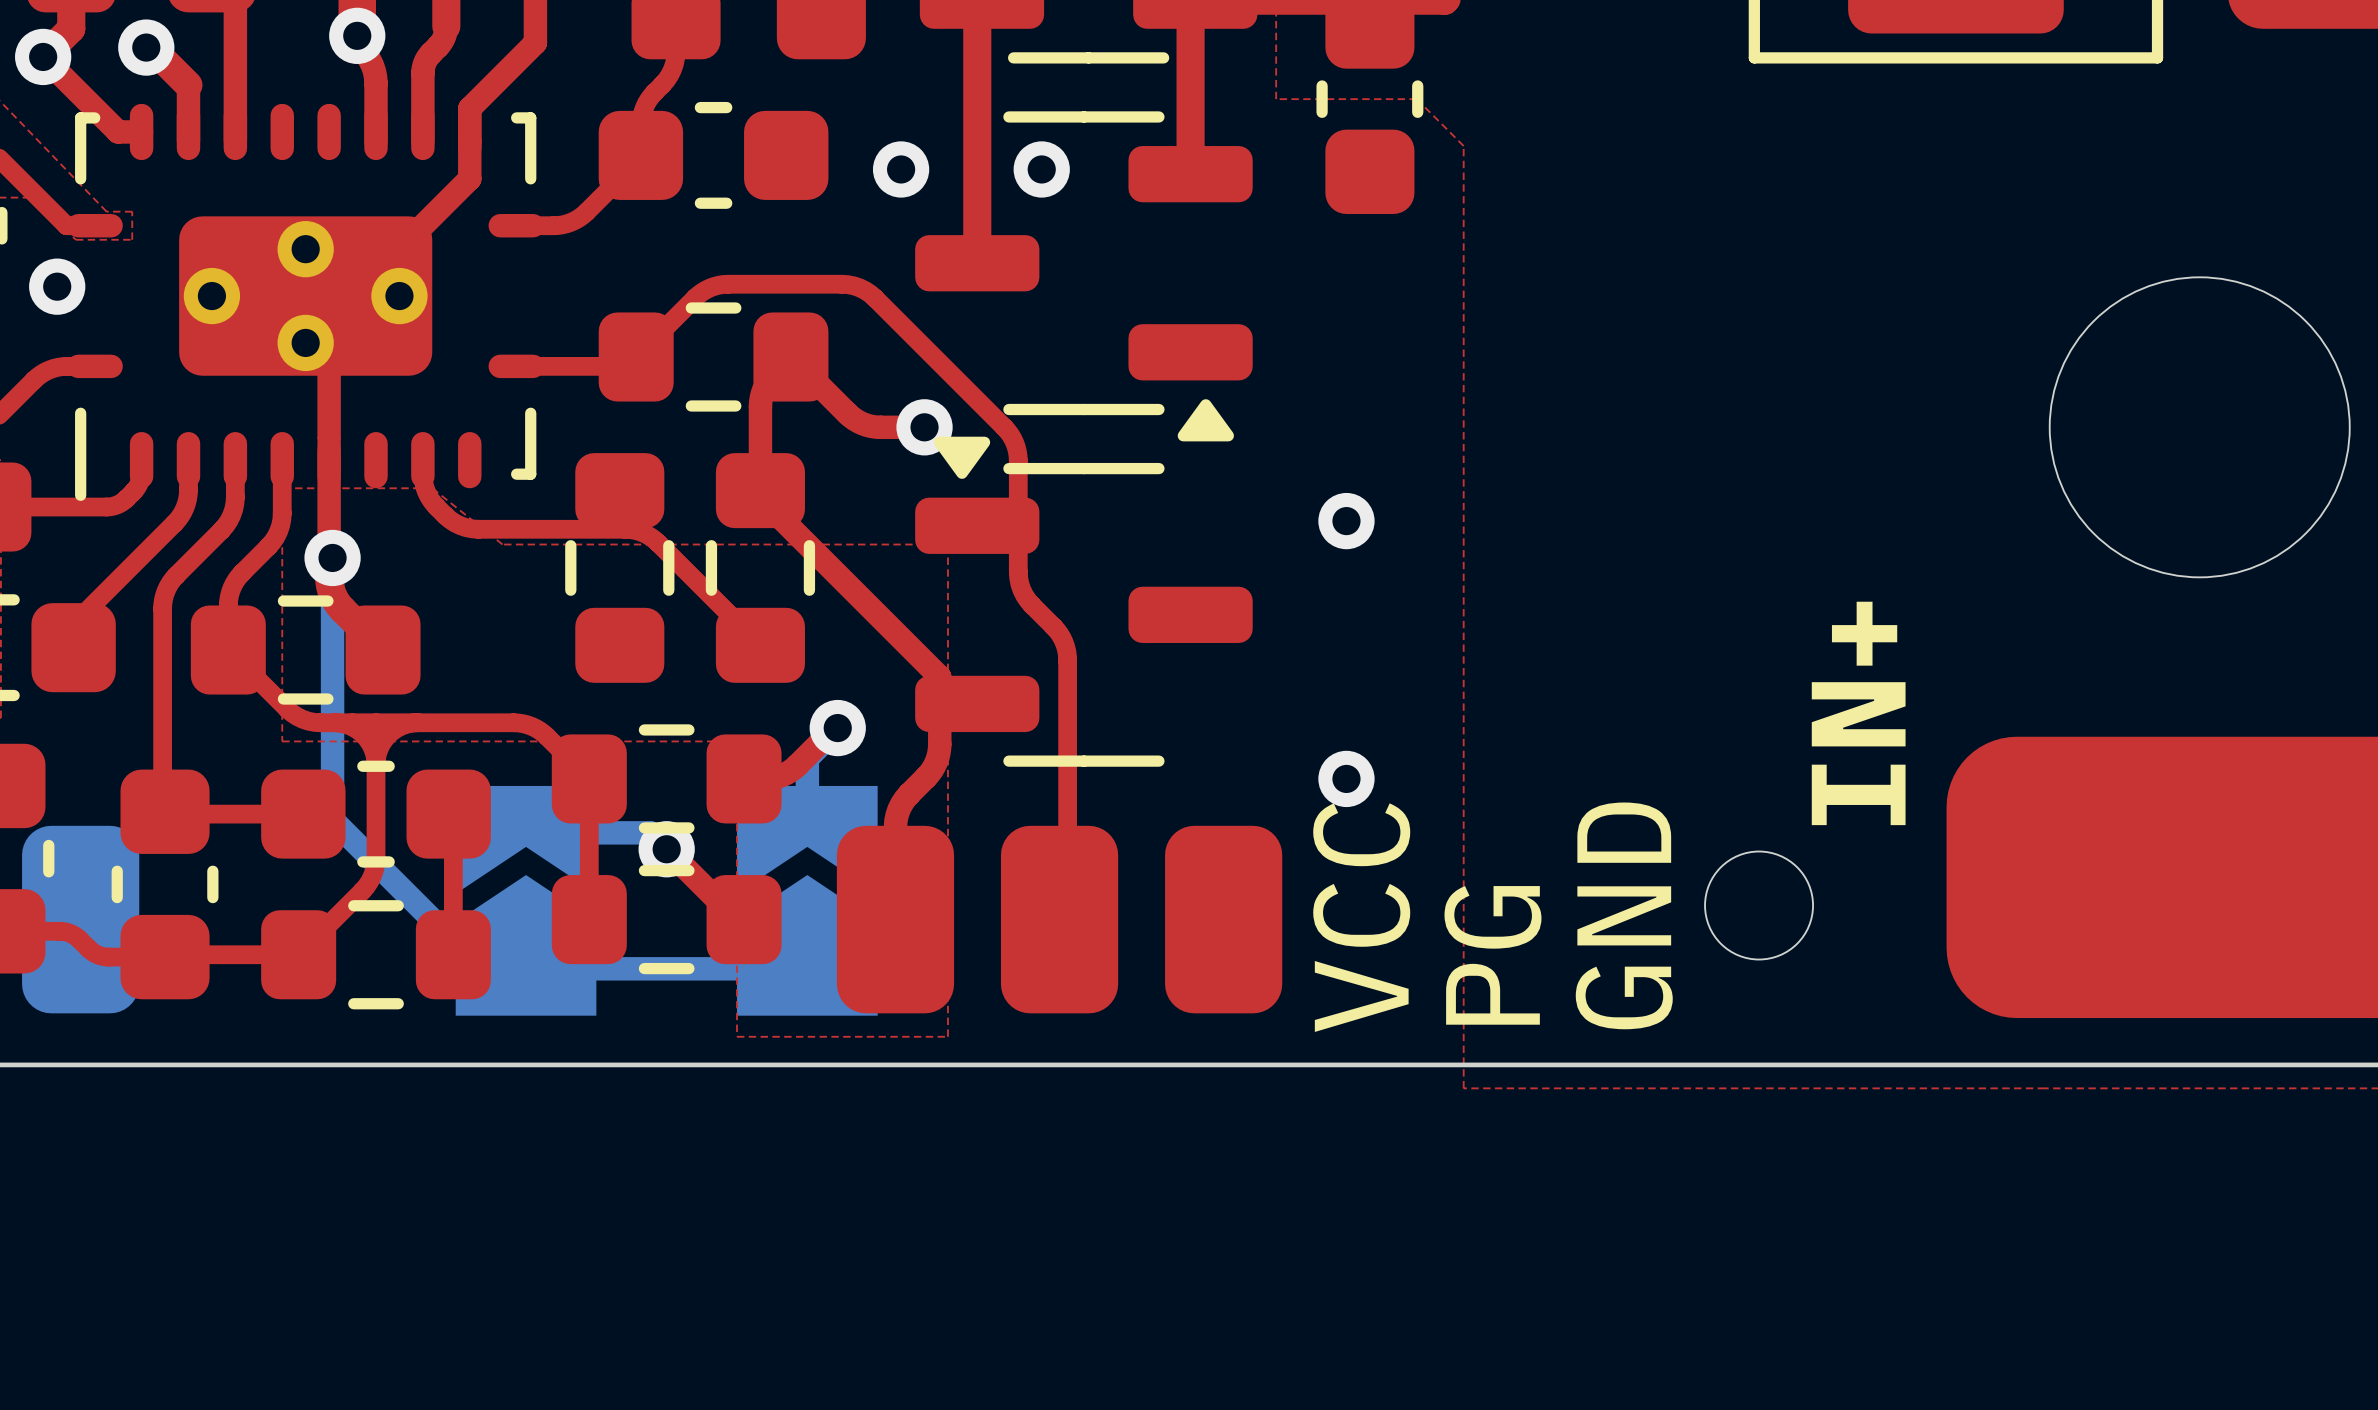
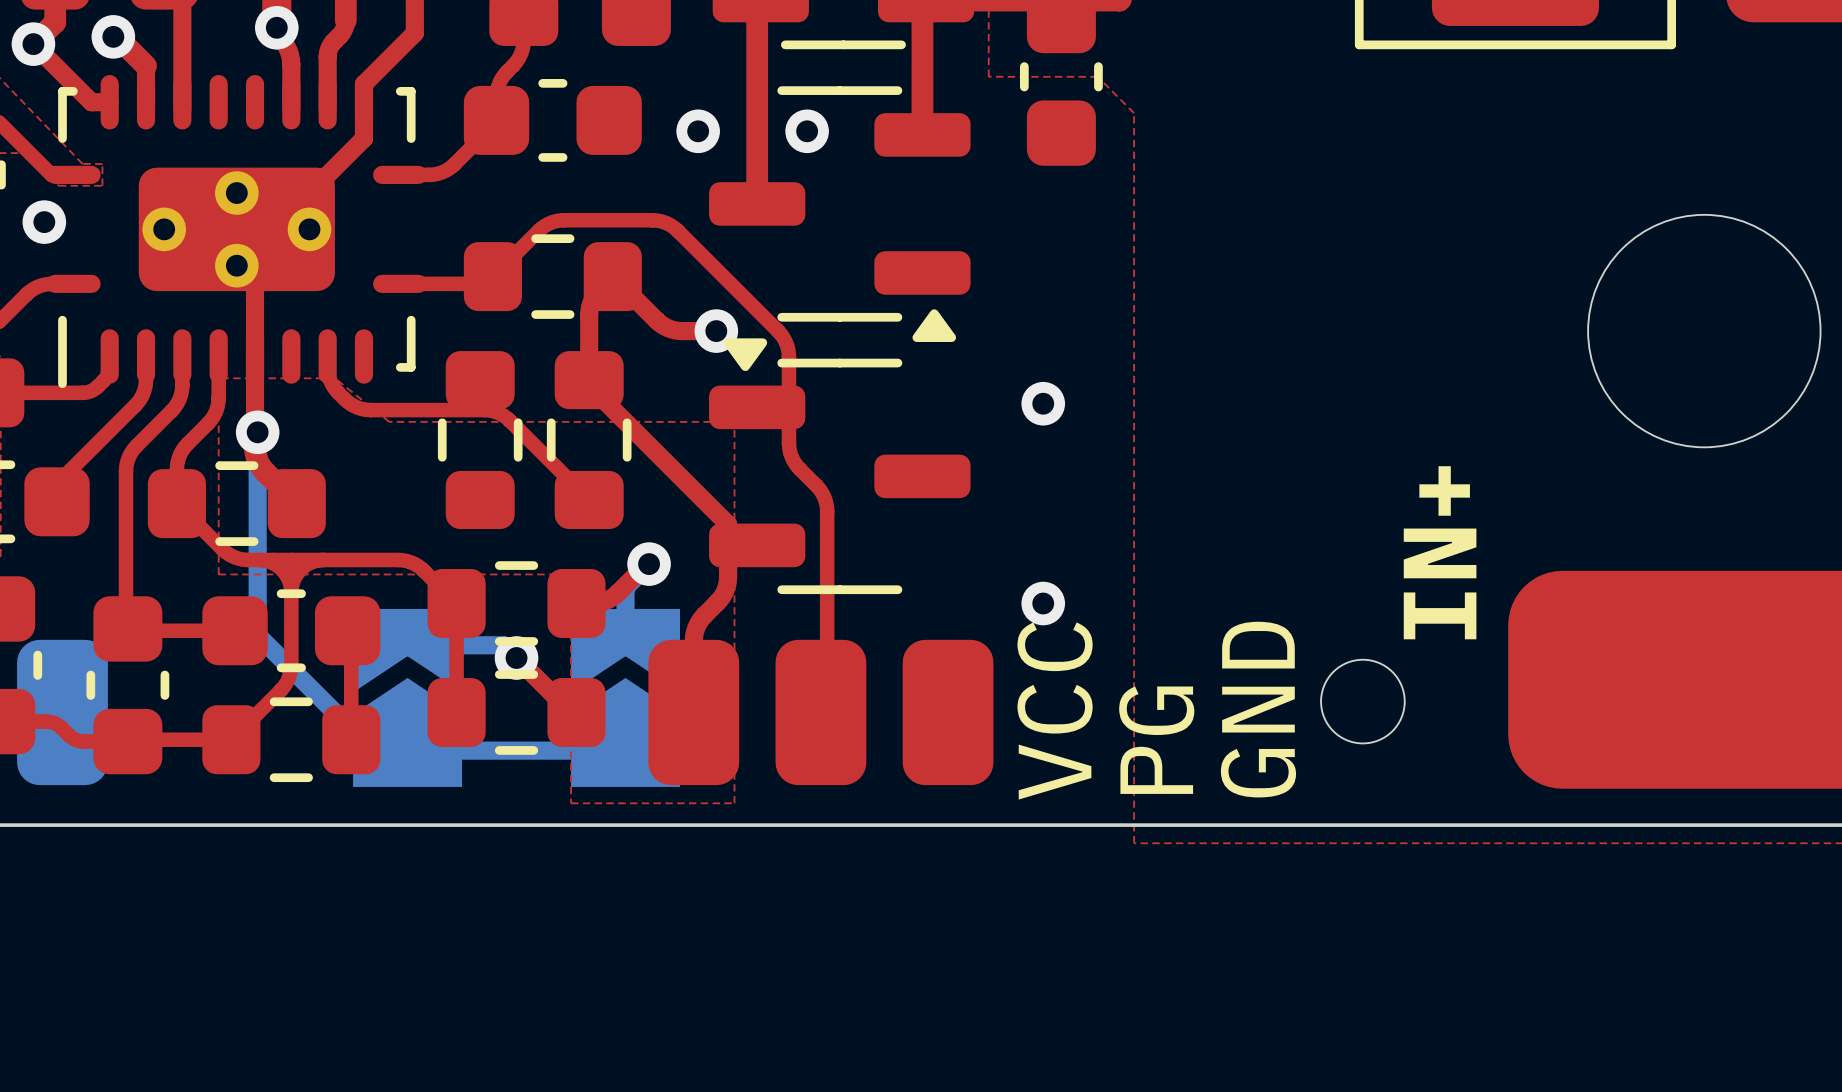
part footprint: [66, 103, 545, 501] -> [46, 75, 428, 389]

